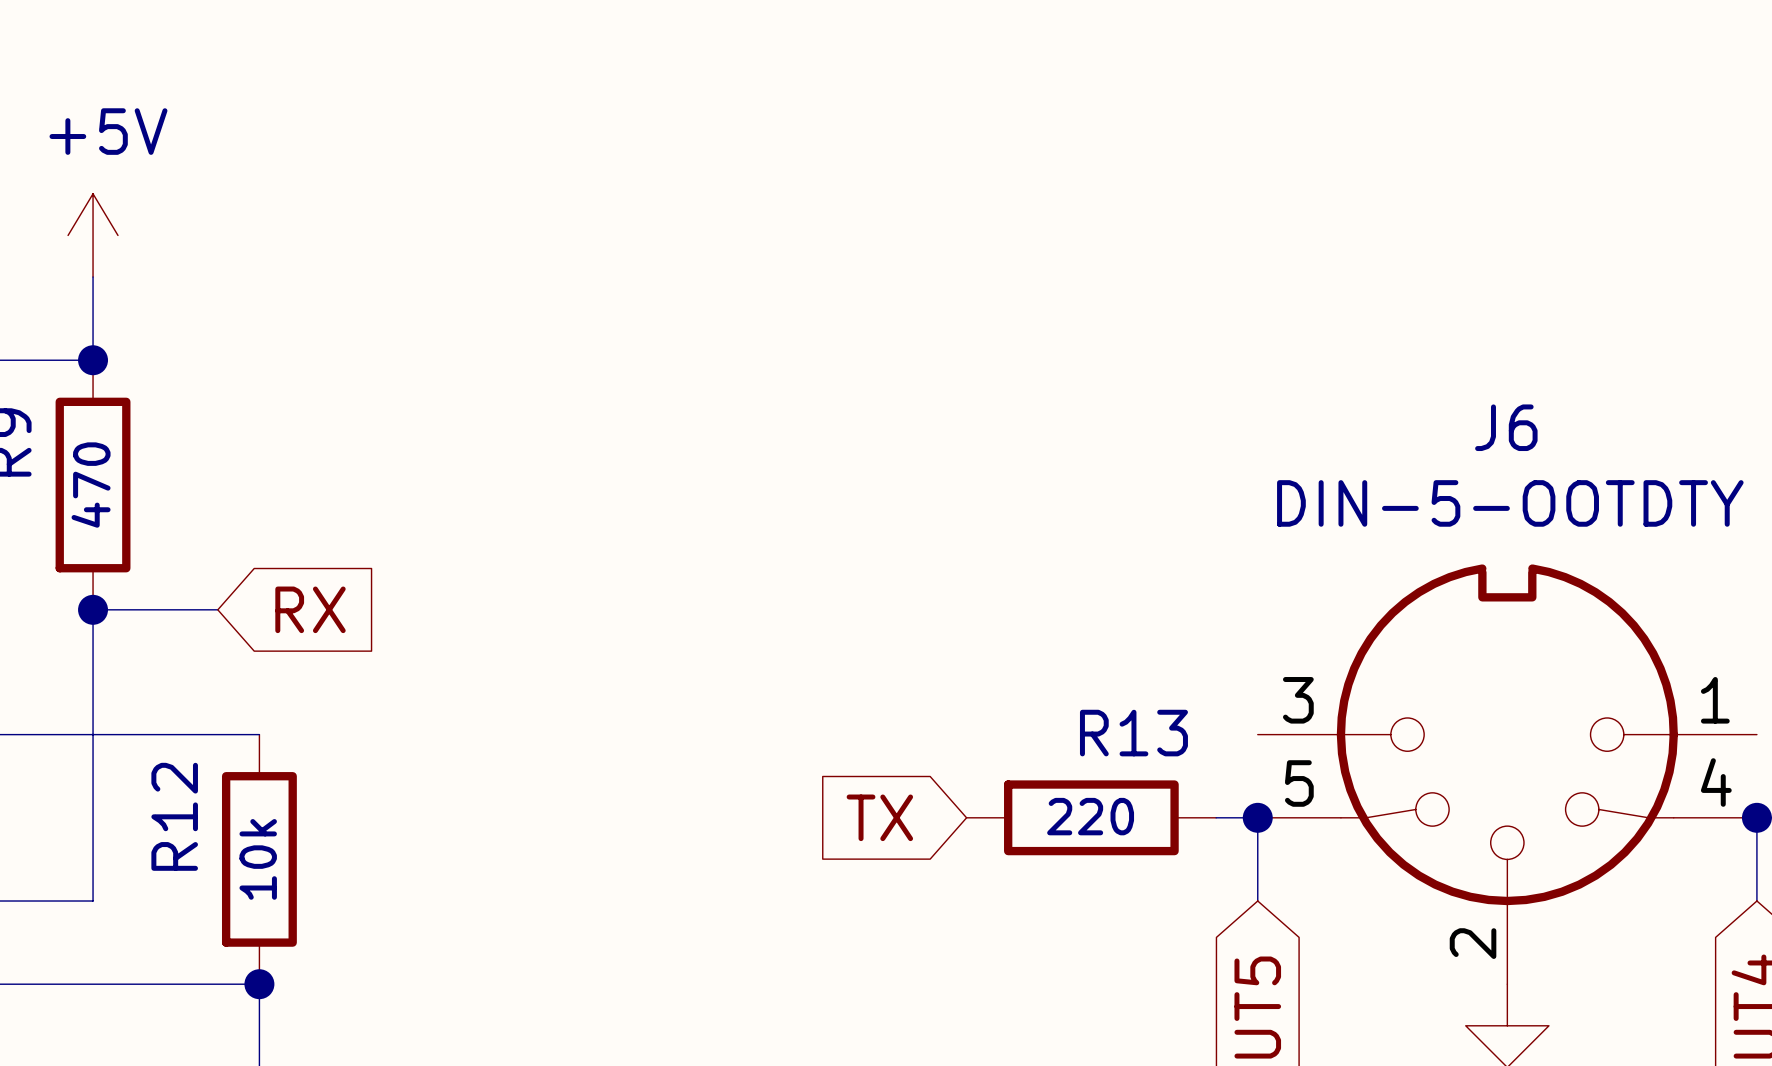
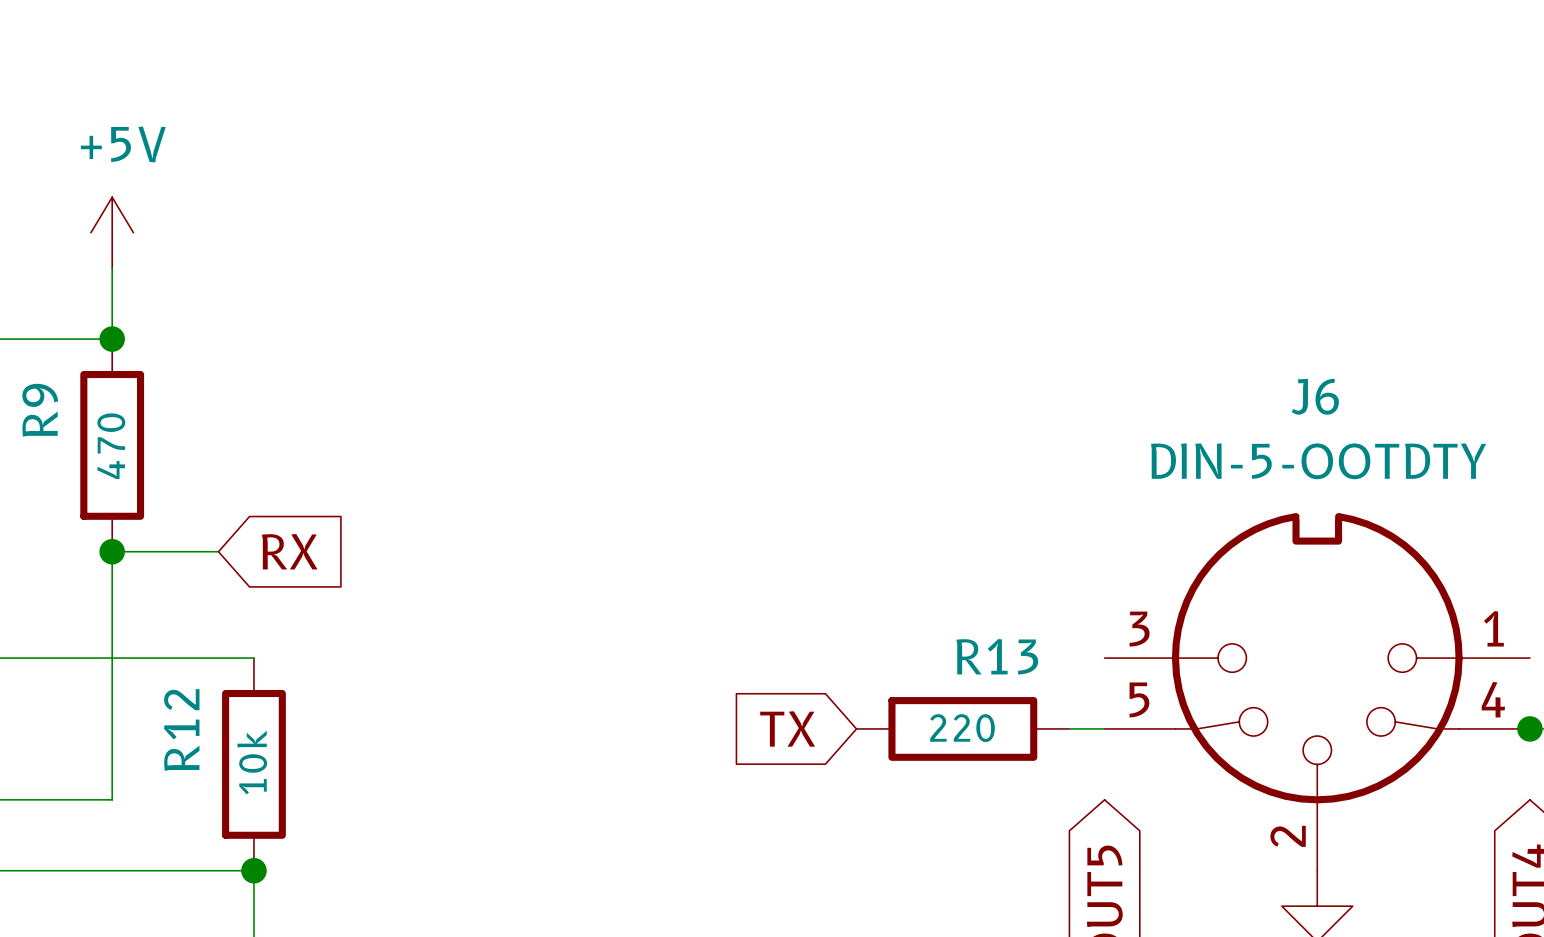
wire: (1257, 817) (1257, 901) -> none
junction: (1257, 817) -> none
wire: (1756, 817) (1756, 901) -> none

